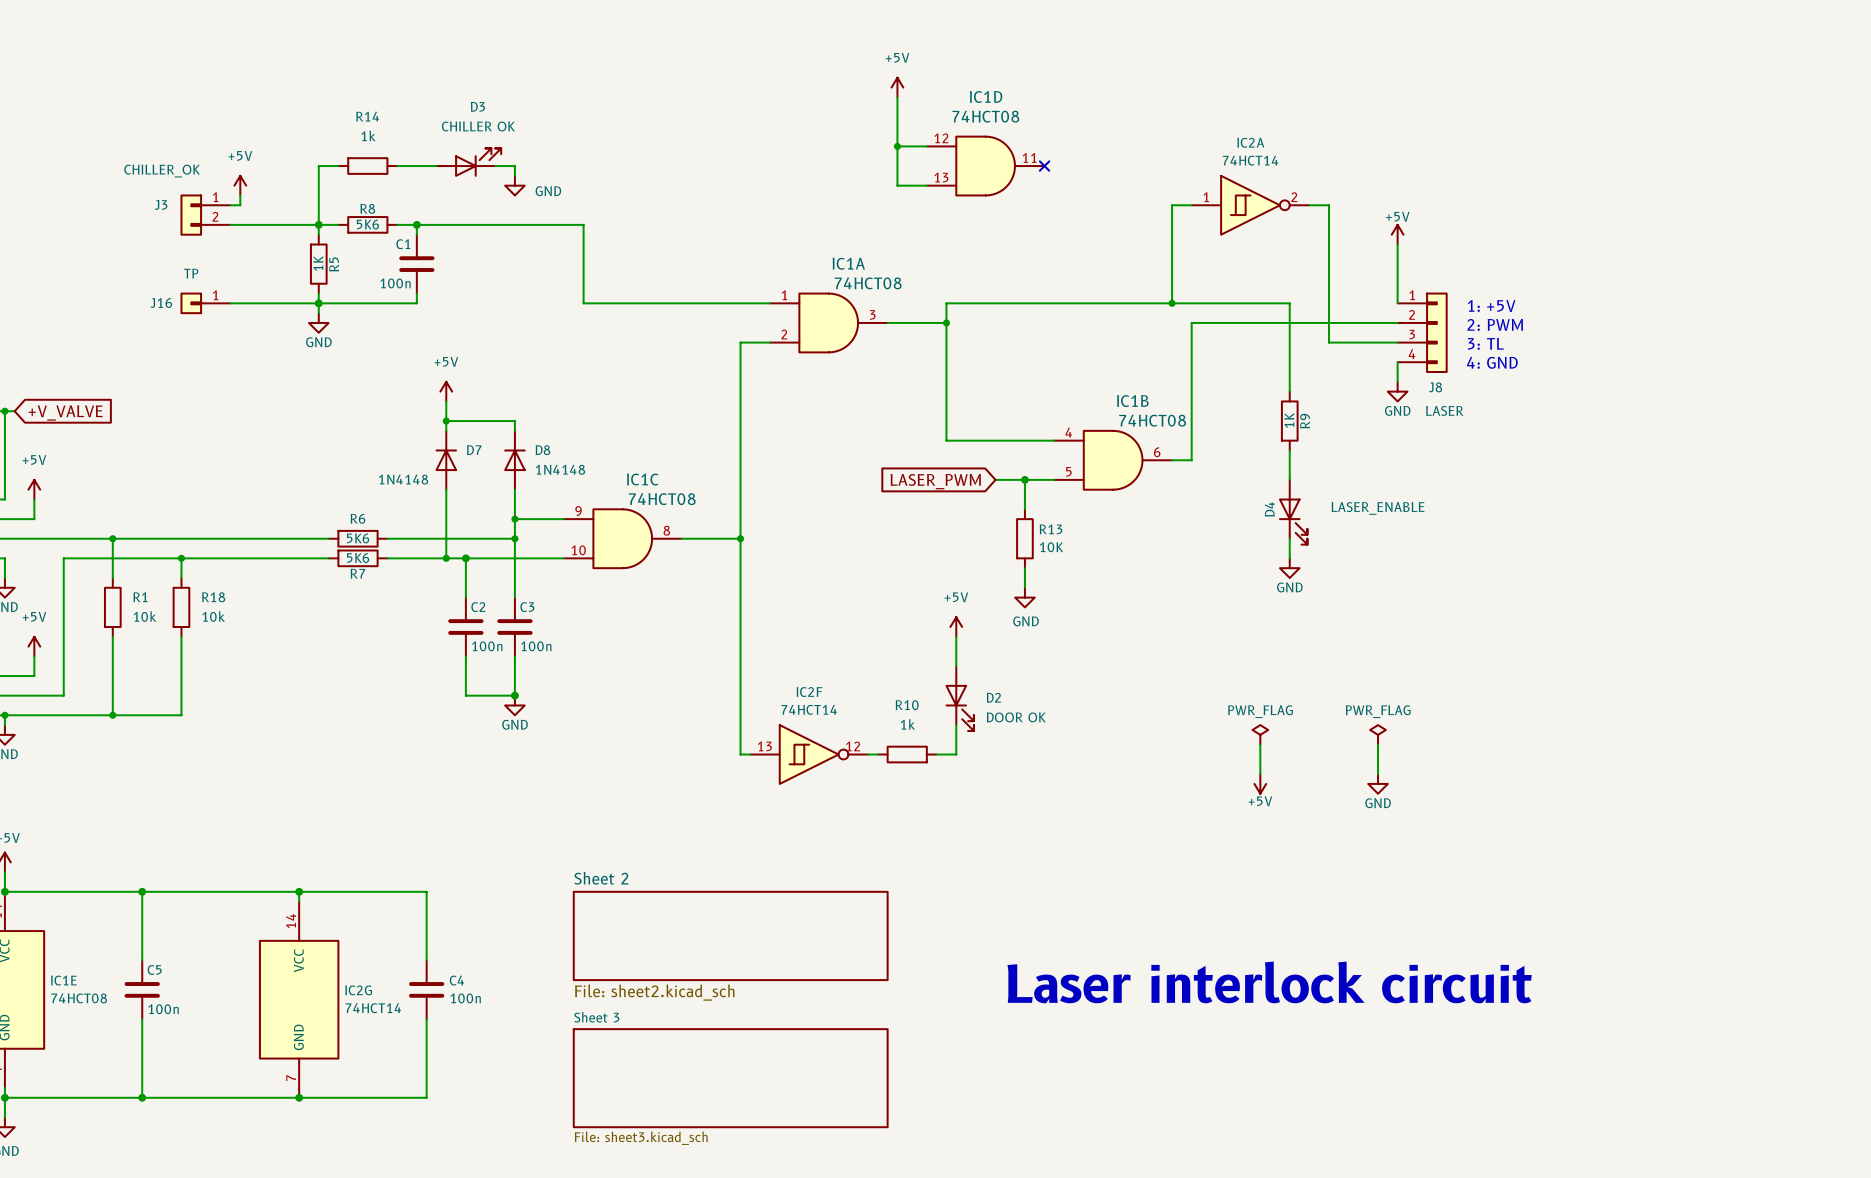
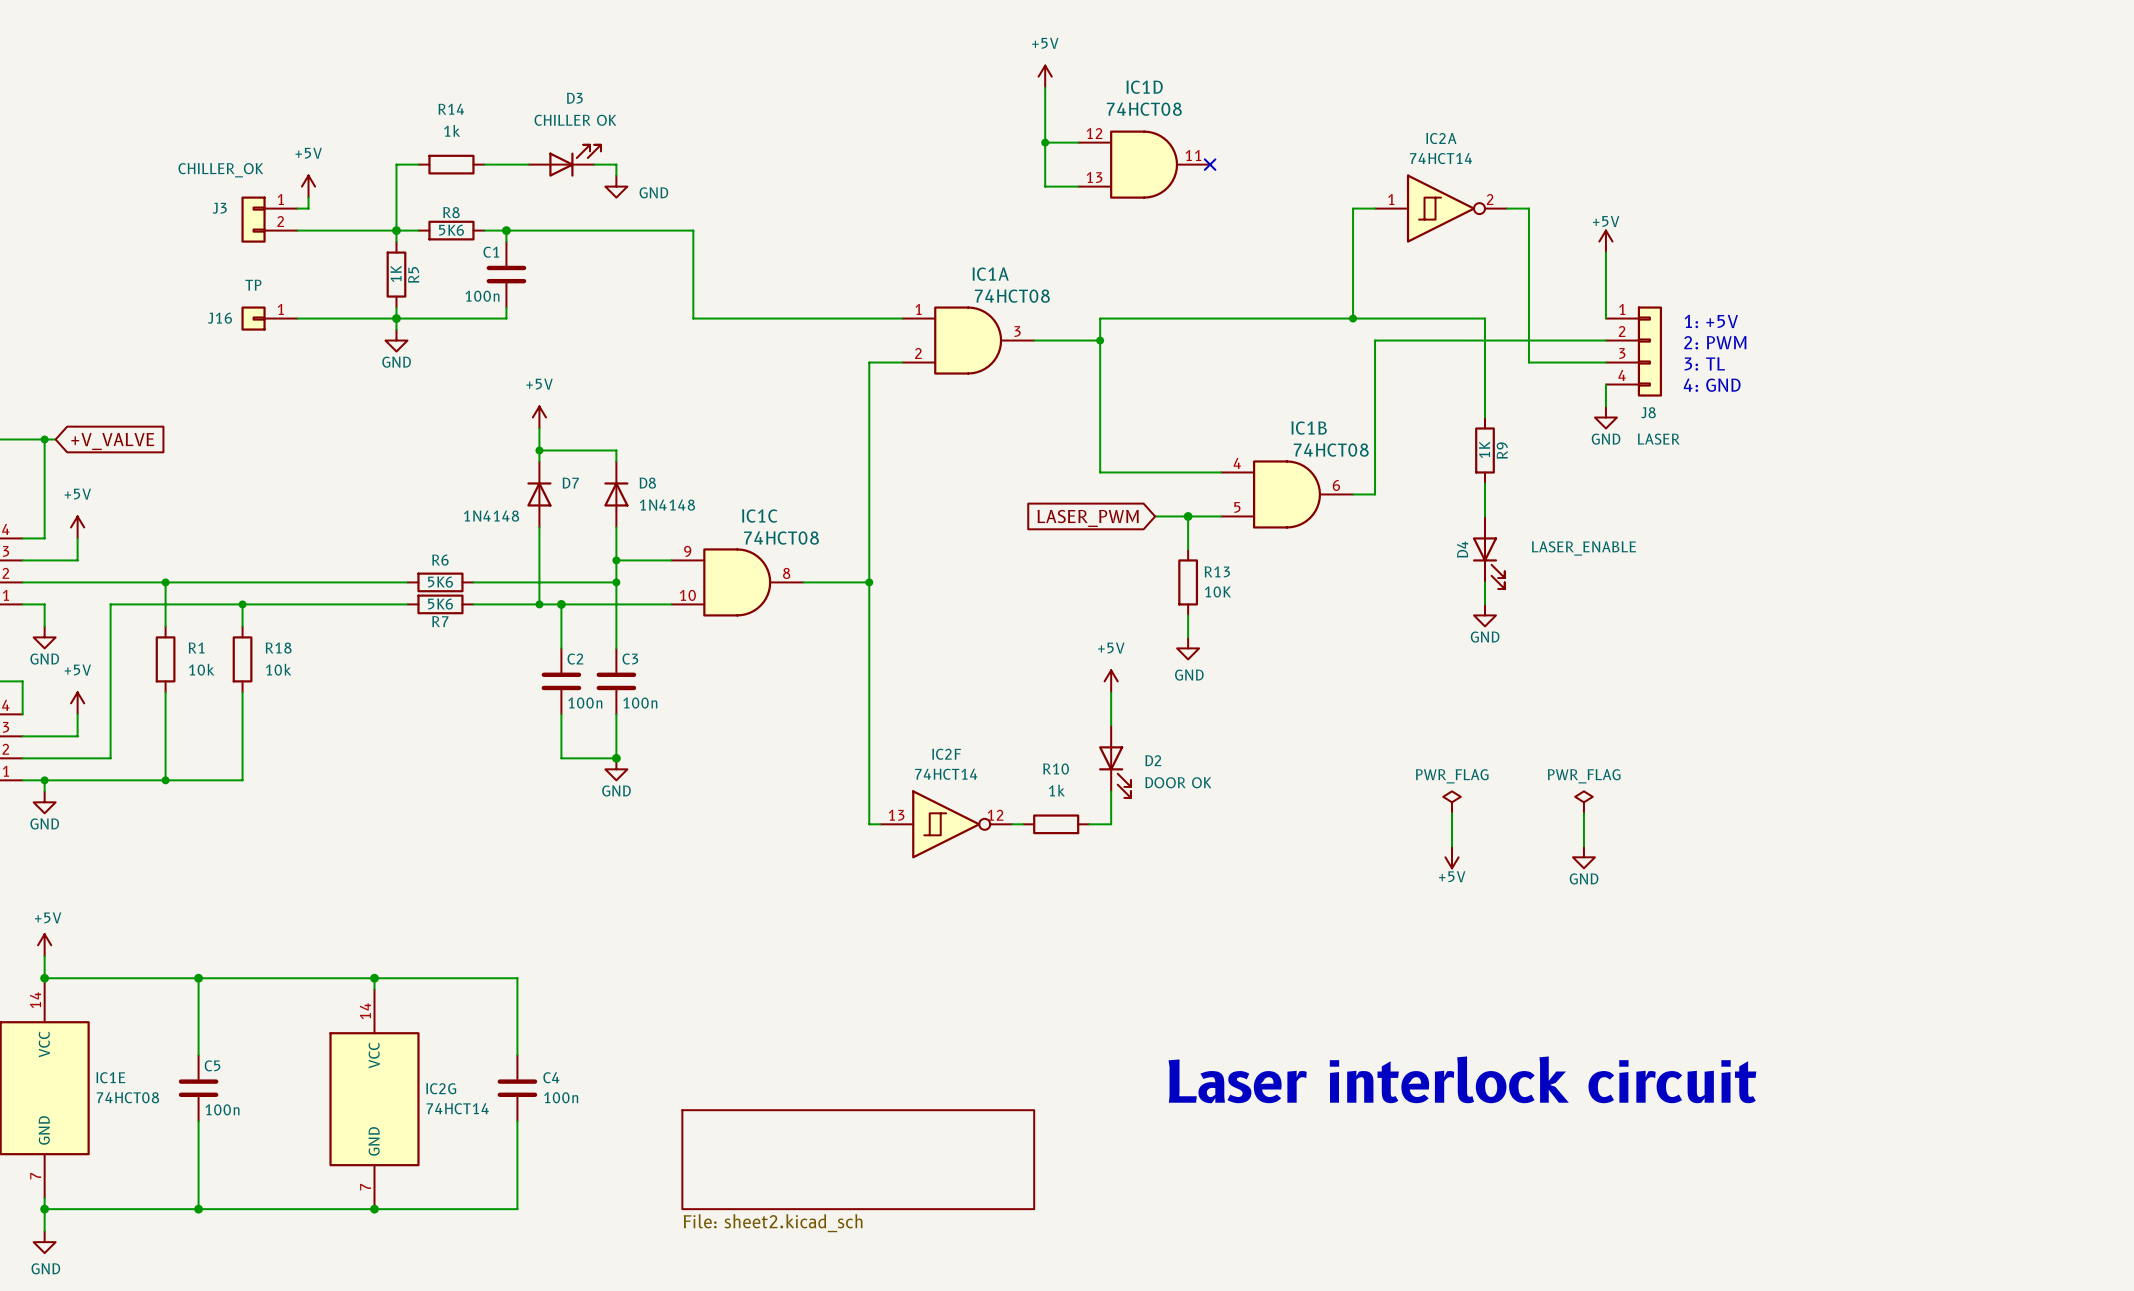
sheet Sheet 2: File: sheet2.kicad_sch (730, 935) -> none
sheet: none -> File: sheet2.kicad_sch (858, 1159)
sheet Sheet 3: File: sheet3.kicad_sch (730, 1078) -> none

